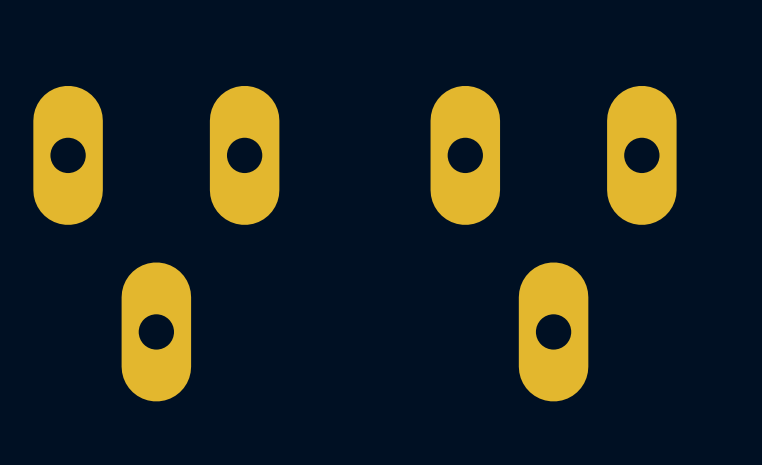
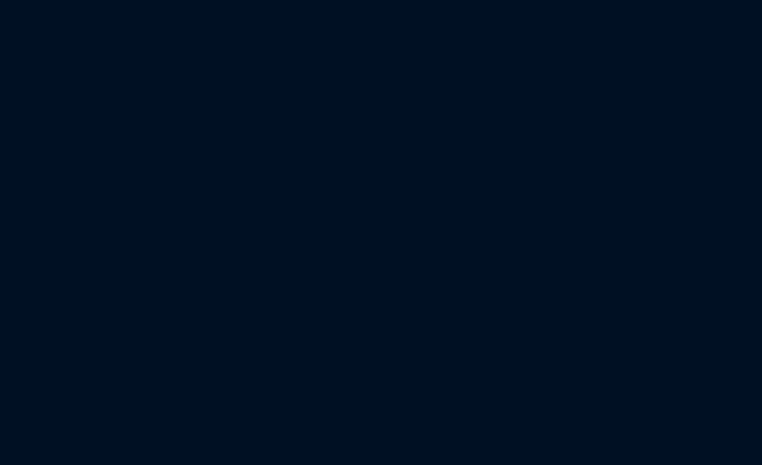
part: (156, 243) -> none
part: (553, 243) -> none

